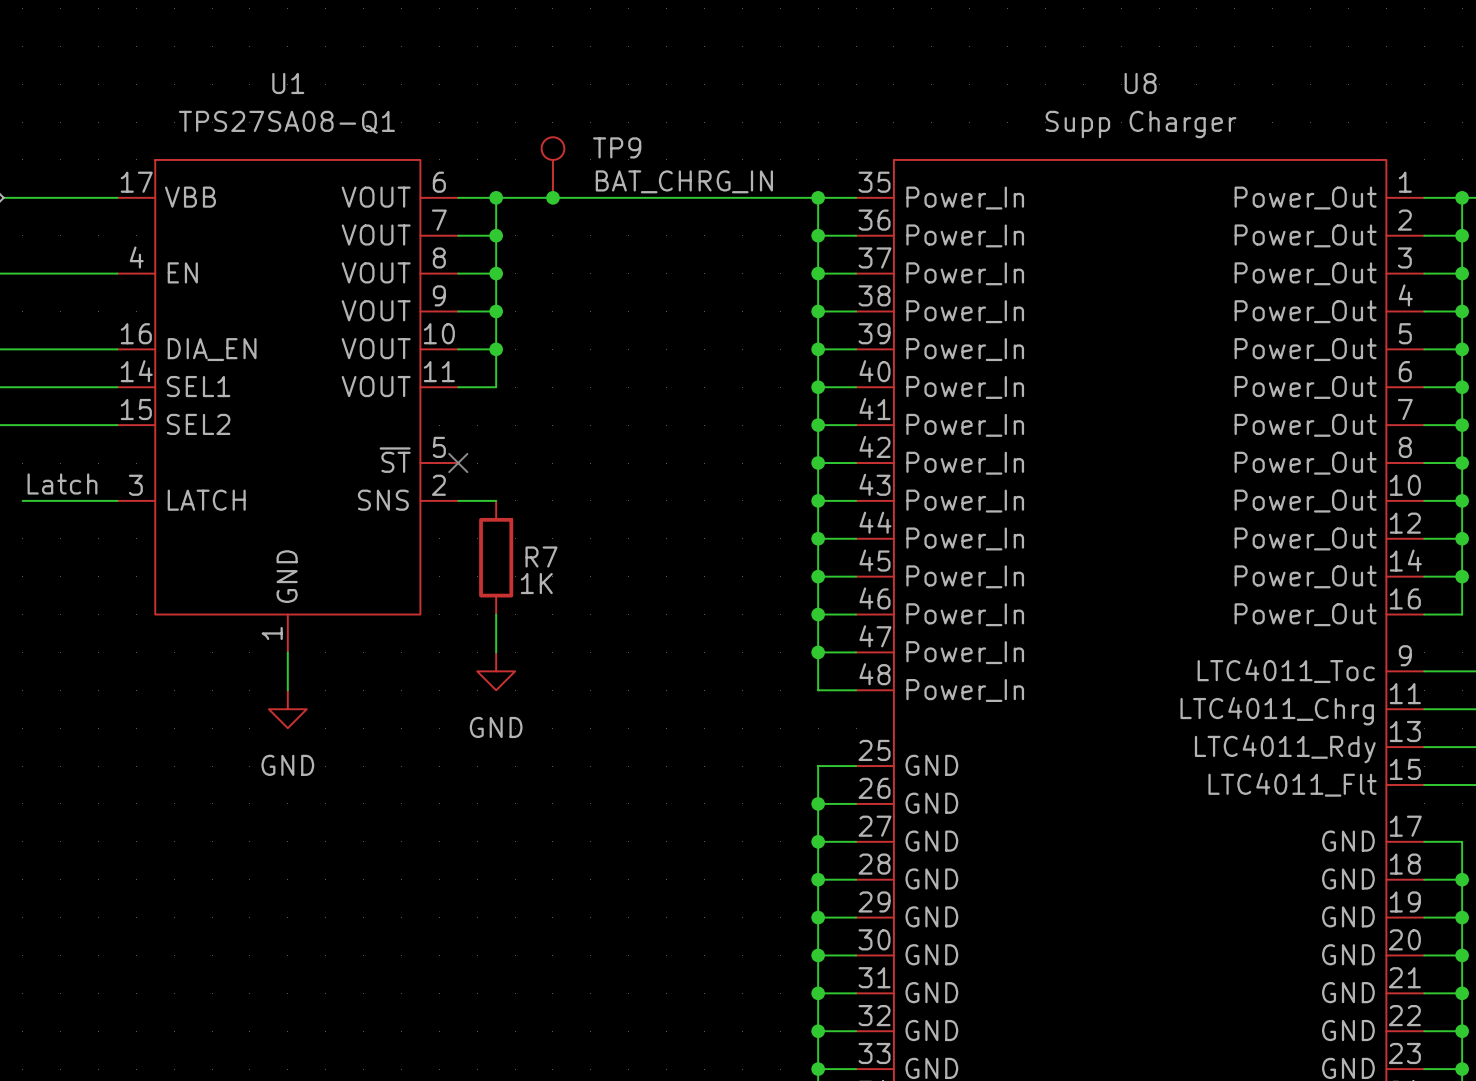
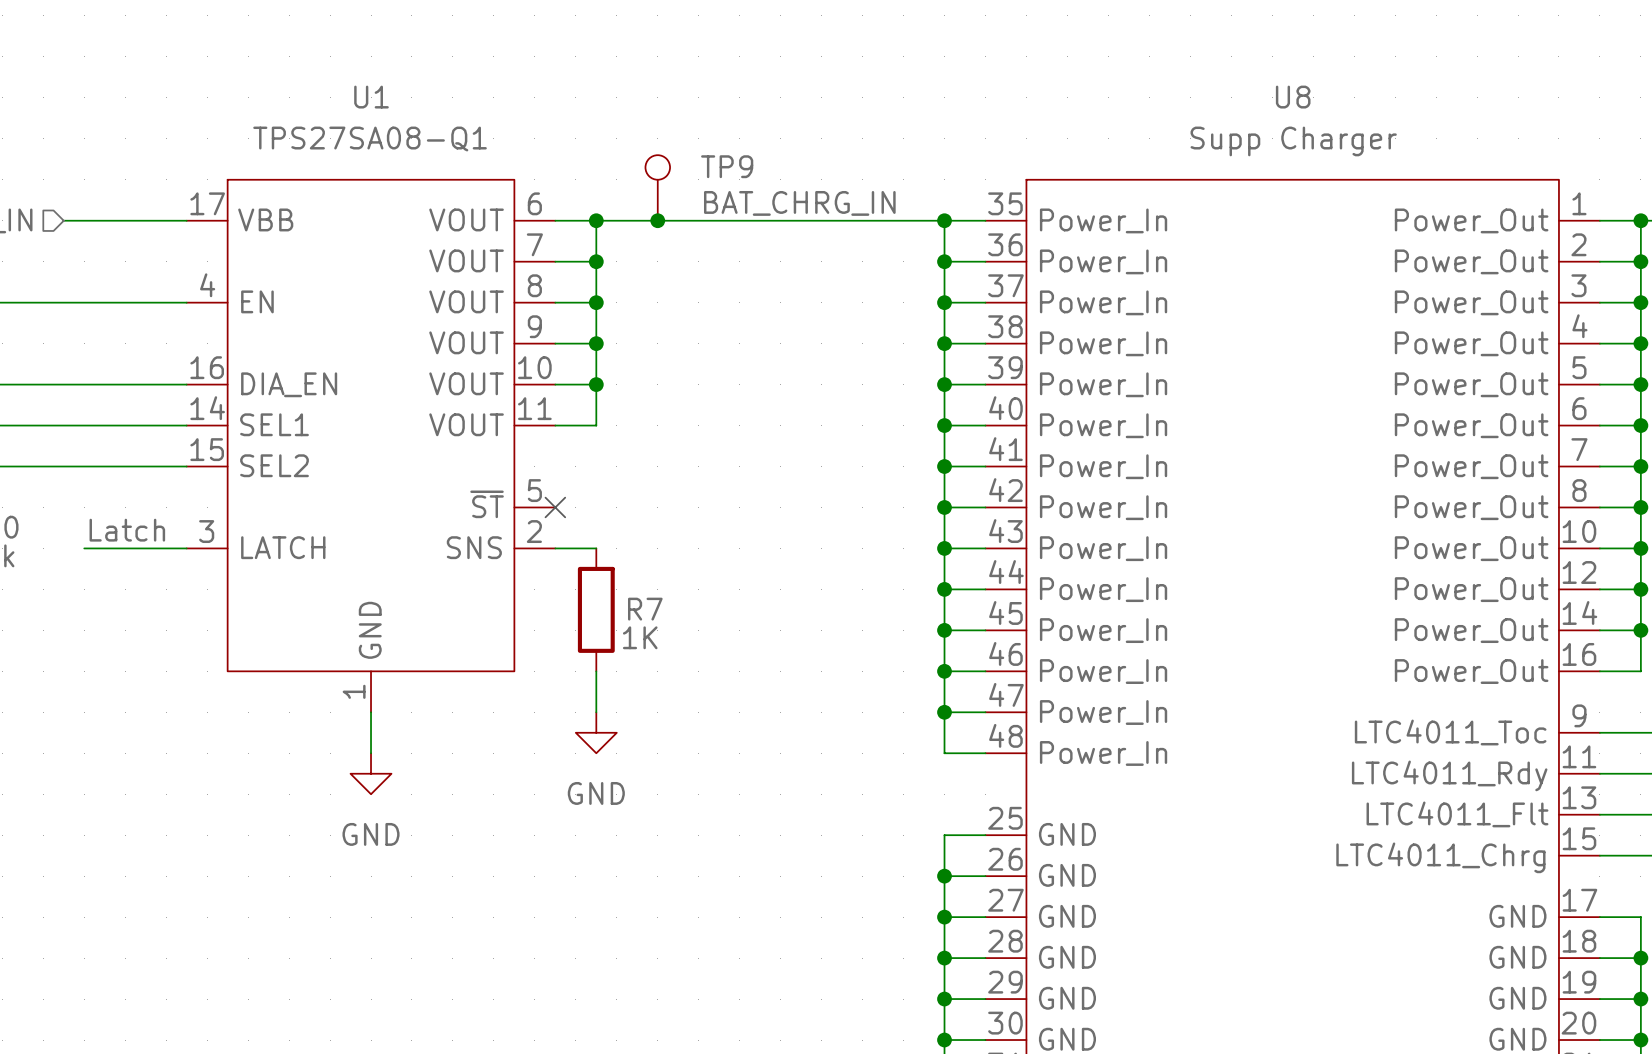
U8 pin name: LTC4011_Chrg (1277, 711) -> LTC4011_Rdy (1449, 775)
U8 pin name: LTC4011_Rdy (1285, 749) -> LTC4011_Flt (1457, 814)
U8 pin name: LTC4011_Flt (1292, 784) -> LTC4011_Chrg (1440, 857)

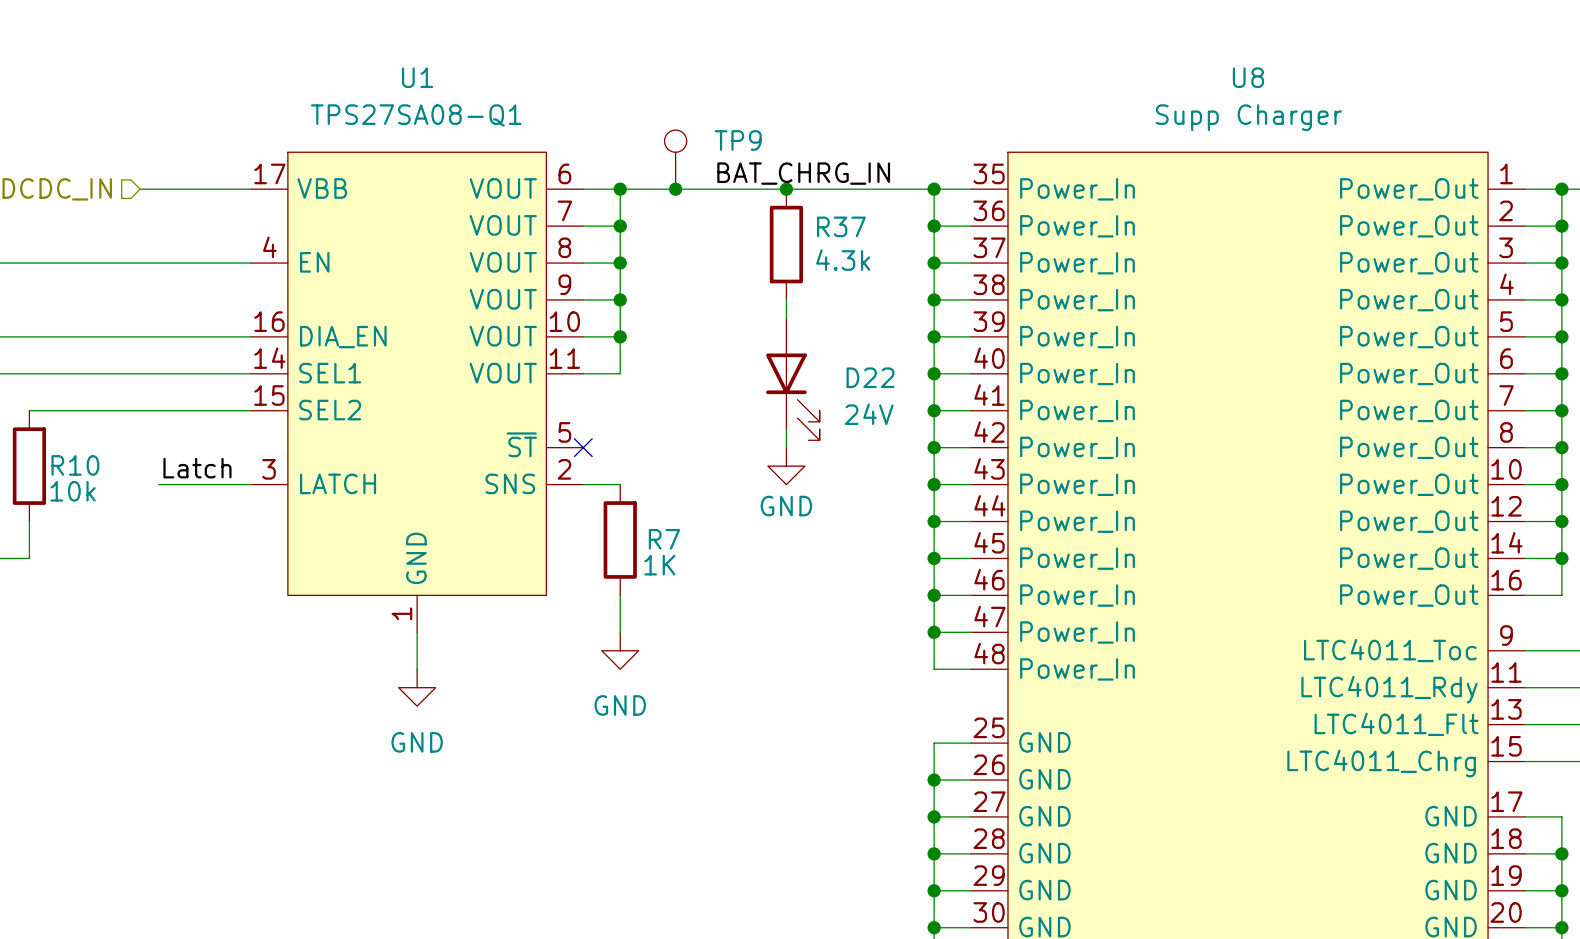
junction: none -> (786, 189)
R37: none -> 4.3k (786, 244)
wire: none -> (786, 299) (786, 318)
D22: none -> 24V (792, 379)
wire: none -> (786, 429) (786, 447)
power symbol: none -> GND (786, 466)

